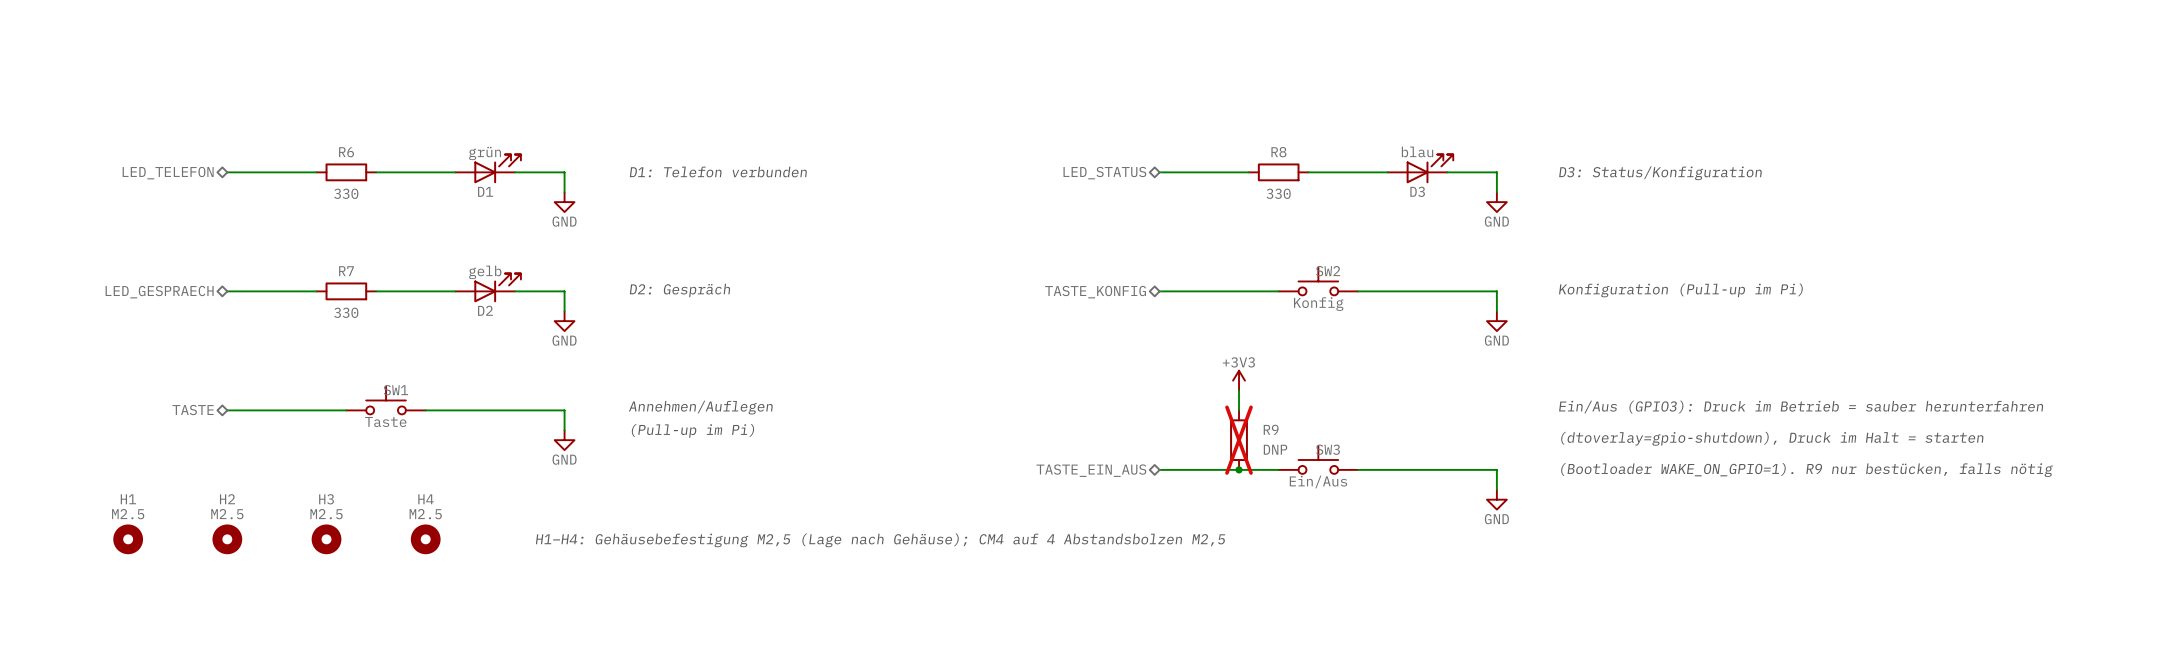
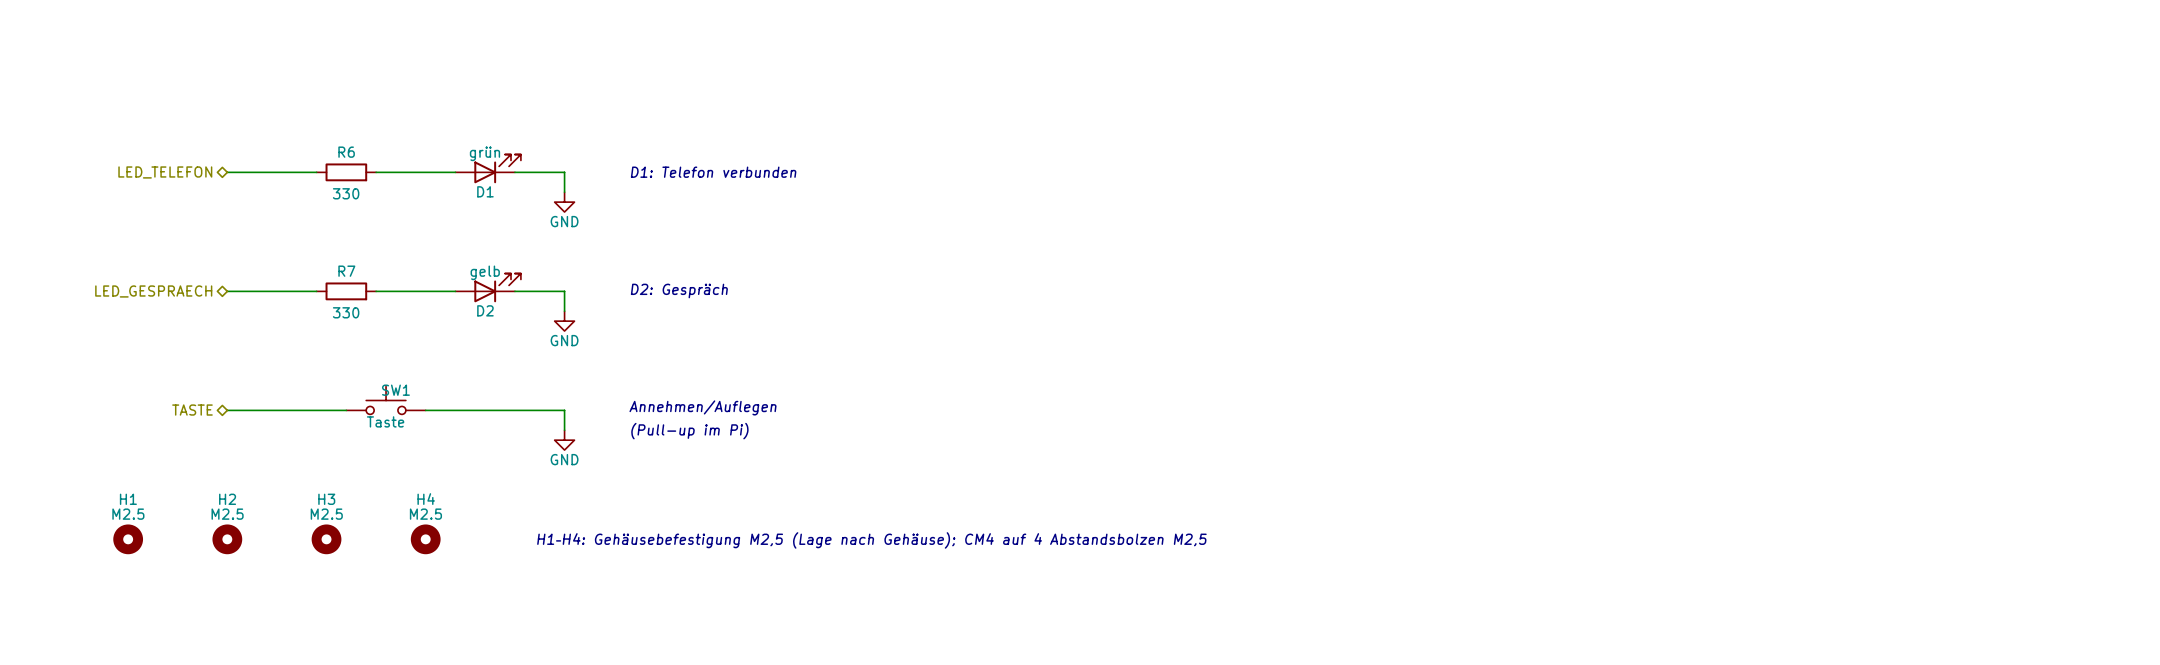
D3: blau (1420, 168) -> none
wire: (1159, 172) (1248, 172) -> none
R8: 330 (1278, 172) -> none
wire: (1308, 172) (1387, 172) -> none
wire: (1447, 172) (1496, 172) (1496, 192) -> none
hierarchical label: LED_STATUS (1104, 173) -> none
text: D3: Status/Konfiguration (1660, 173) -> none
power symbol: GND (1496, 202) -> none
SW2: Konfig (1318, 281) -> none
text: Konfiguration (Pull-up im Pi) (1680, 290) -> none
wire: (1159, 291) (1278, 291) -> none
wire: (1358, 291) (1496, 291) (1496, 311) -> none
hierarchical label: TASTE_KONFIG (1095, 292) -> none
power symbol: GND (1496, 321) -> none
power symbol: +3V3 (1239, 380) -> none
wire: (1239, 390) (1239, 410) -> none
text: Ein/Aus (GPIO3): Druck im Betrieb = sauber herunterfahren (1801, 407) -> none
text: (dtoverlay=gpio-shutdown), Druck im Halt = starten (1772, 438) -> none
R9: DNP (1239, 440) -> none
SW3: Ein/Aus (1318, 459) -> none
wire: (1159, 469) (1278, 469) -> none
junction: (1239, 469) -> none
wire: (1358, 469) (1496, 469) (1496, 489) -> none
hierarchical label: TASTE_EIN_AUS (1091, 470) -> none
text: (Bootloader WAKE_ON_GPIO=1). R9 nur bestücken, falls nötig (1806, 470) -> none
power symbol: GND (1496, 499) -> none

